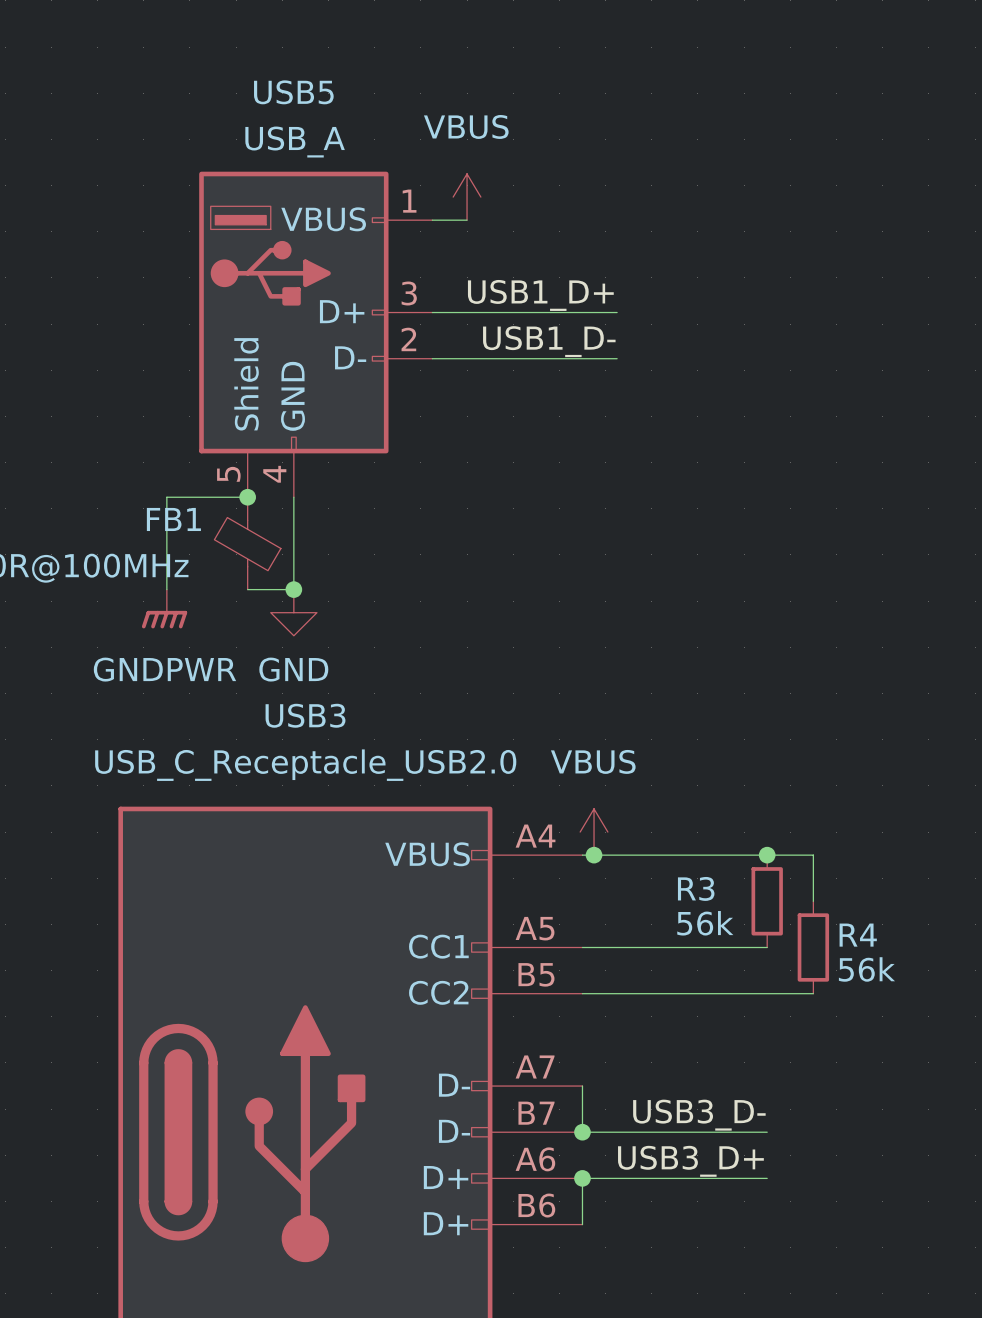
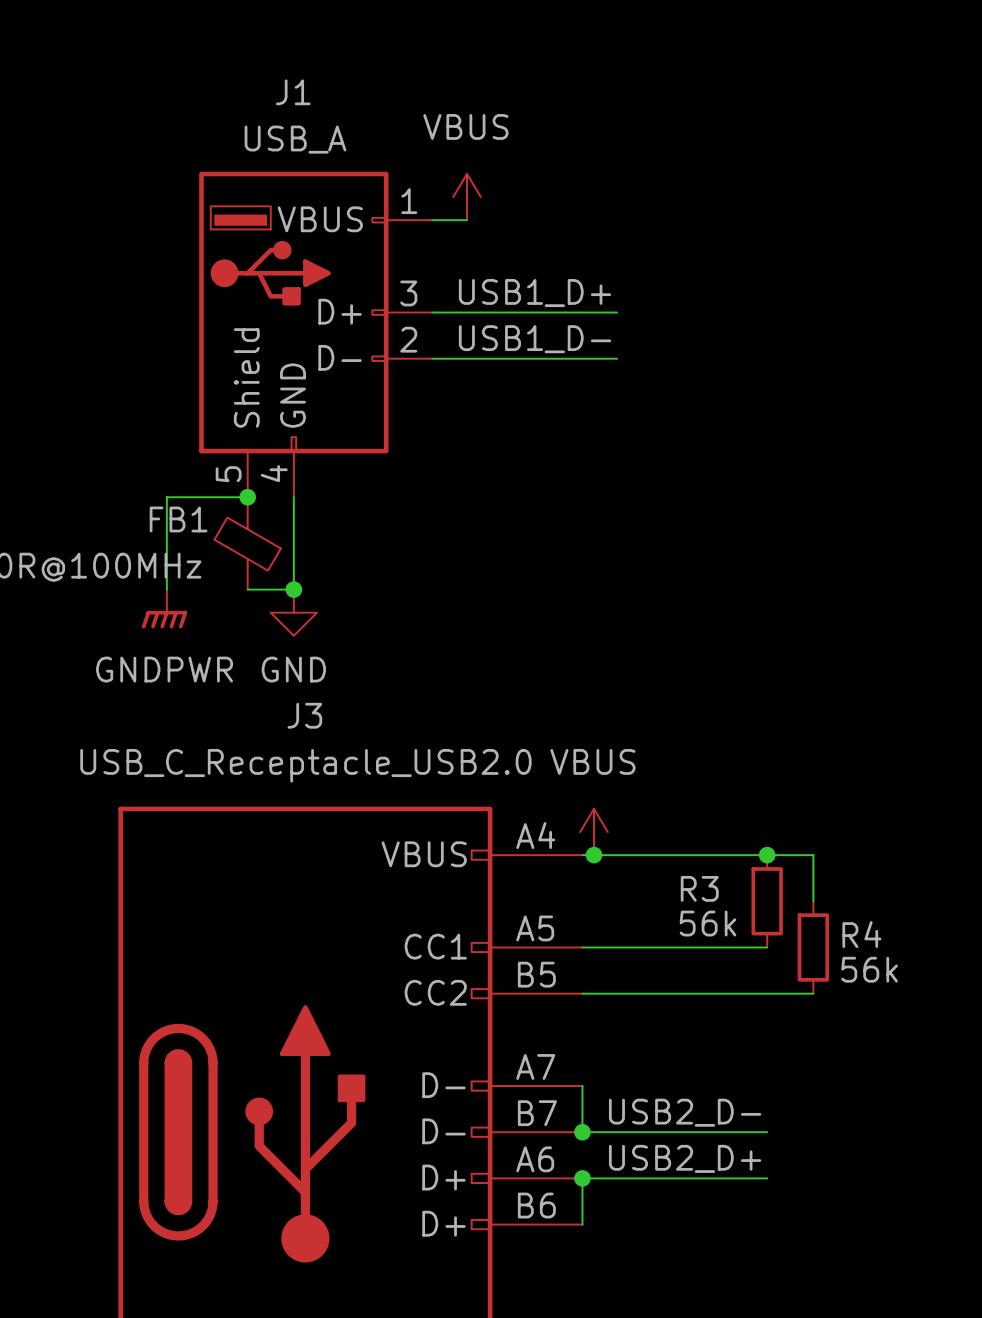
USB5 name: USB5 (293, 92) -> J1 (293, 92)
USB3 name: USB3 (305, 715) -> J3 (304, 715)
label: USB3_D- (699, 1115) -> USB2_D- (685, 1112)
label: USB3_D+ (690, 1161) -> USB2_D+ (685, 1158)

